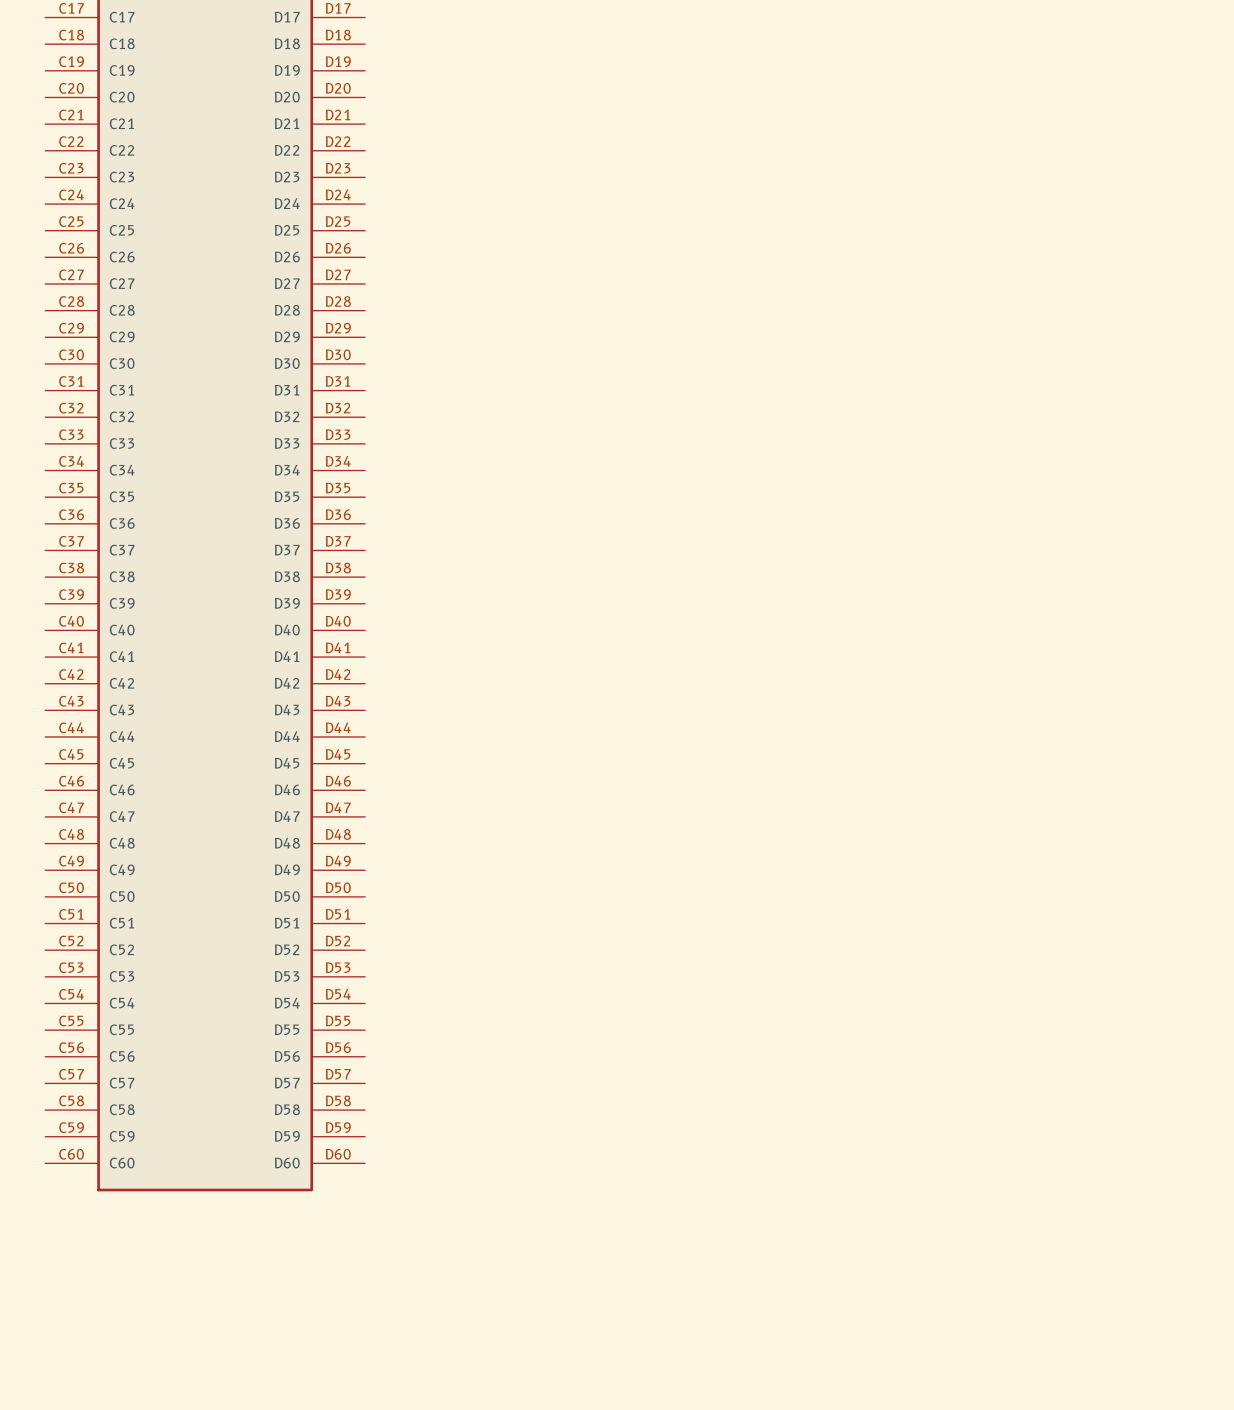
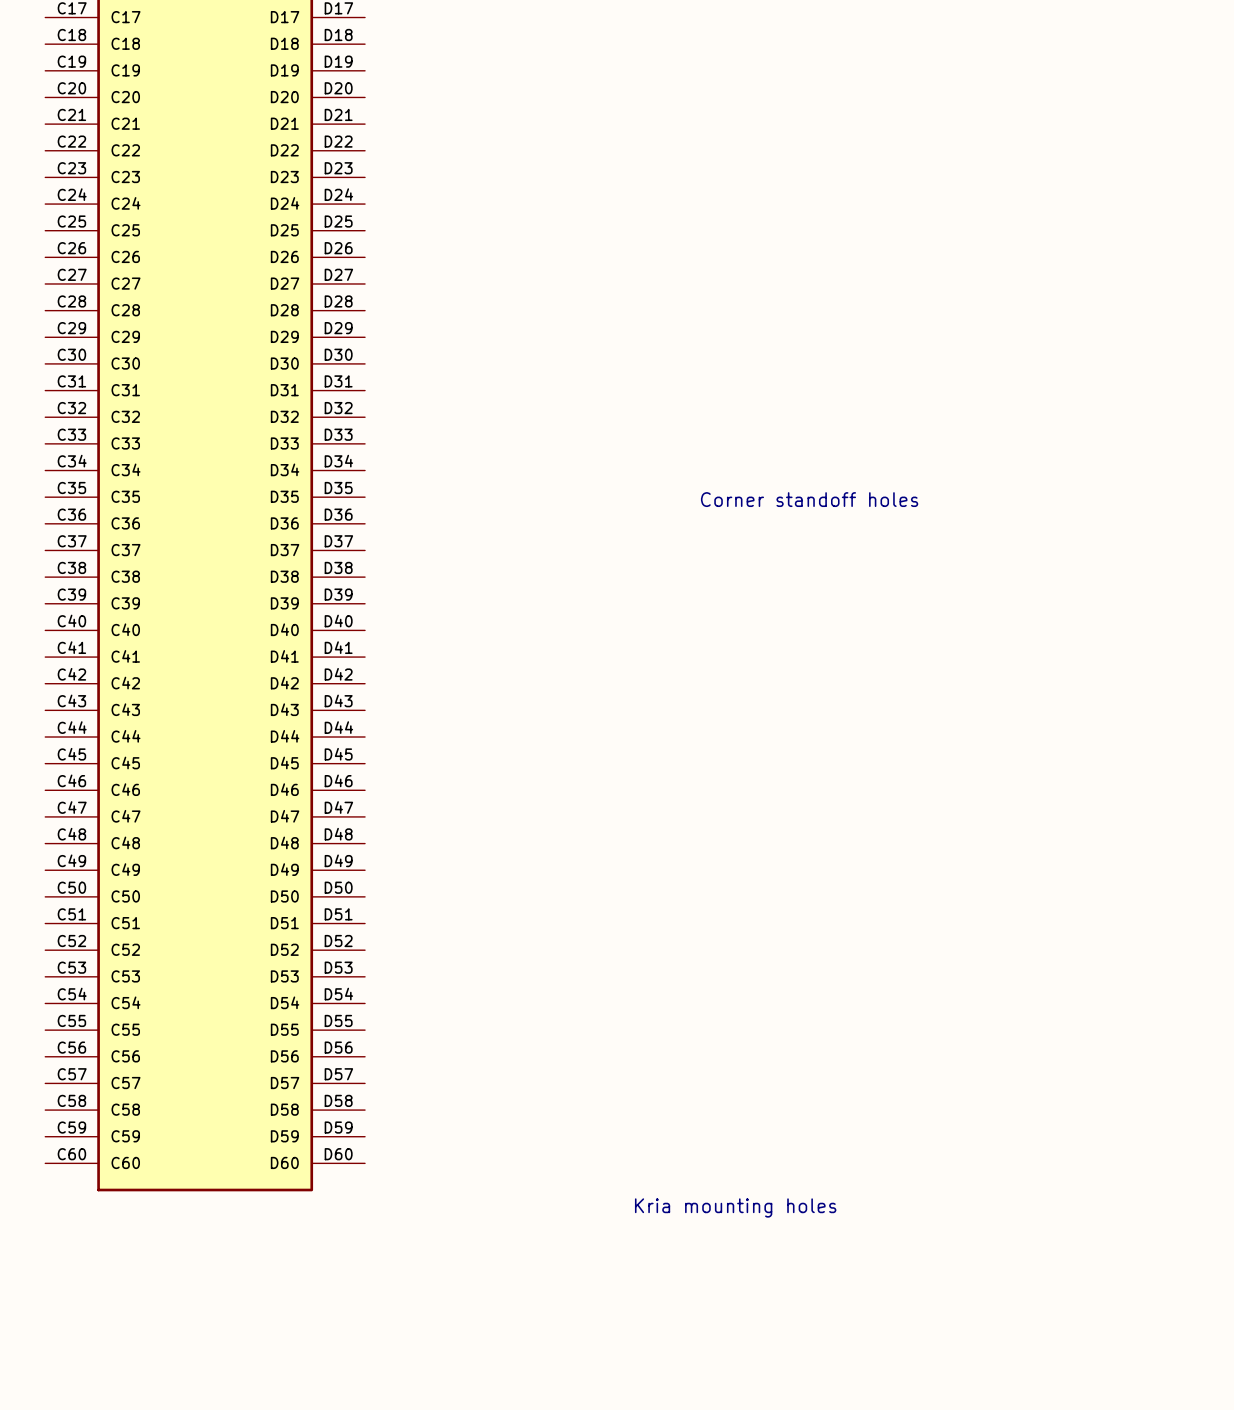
text: none -> Corner standoff holes (809, 499)
text: none -> Kria mounting holes (735, 1207)

